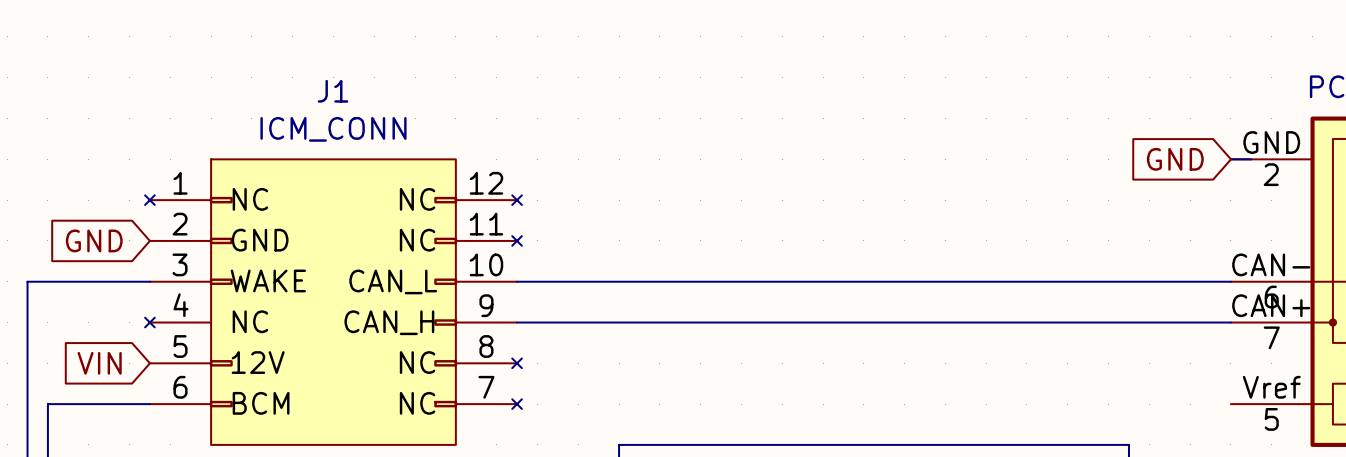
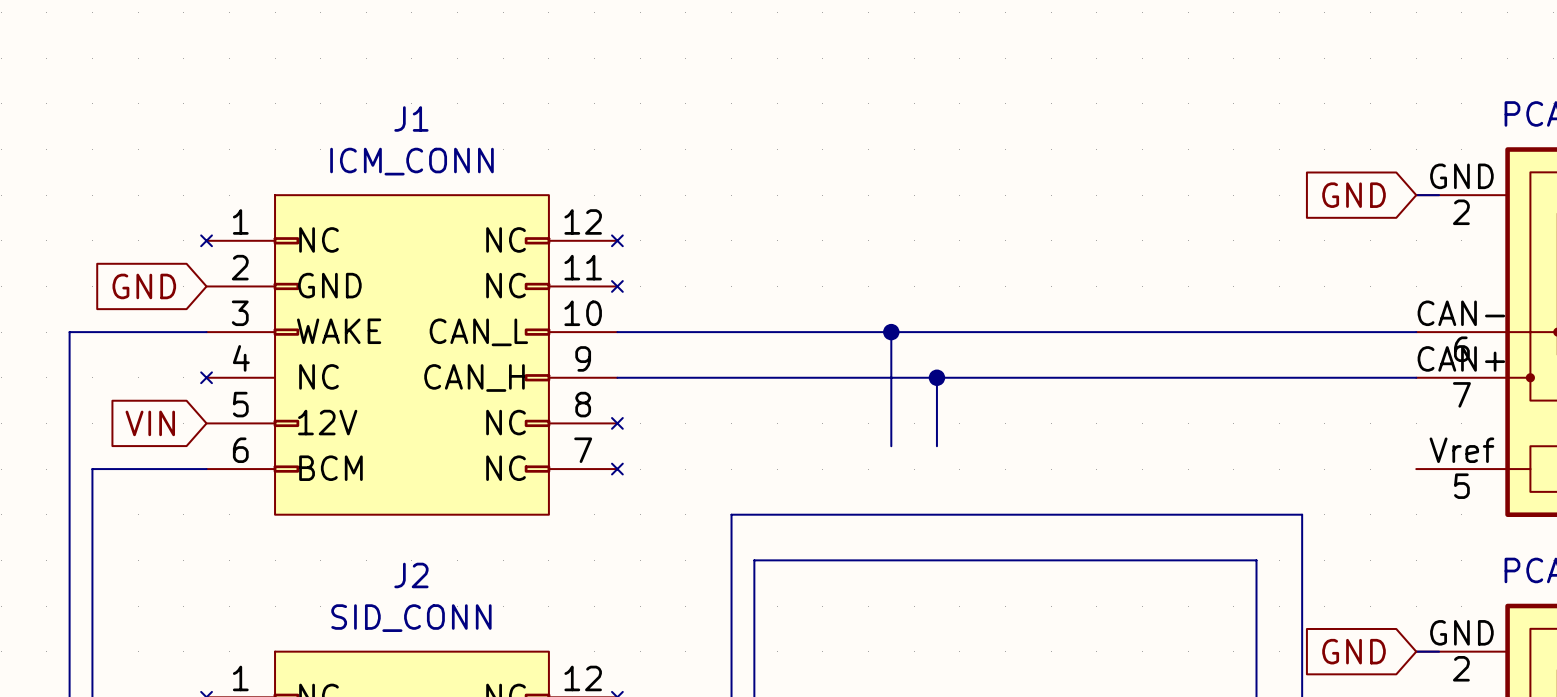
wire: none -> (891, 332) (891, 446)
junction: none -> (891, 332)
wire: none -> (936, 377) (936, 446)
junction: none -> (936, 377)

